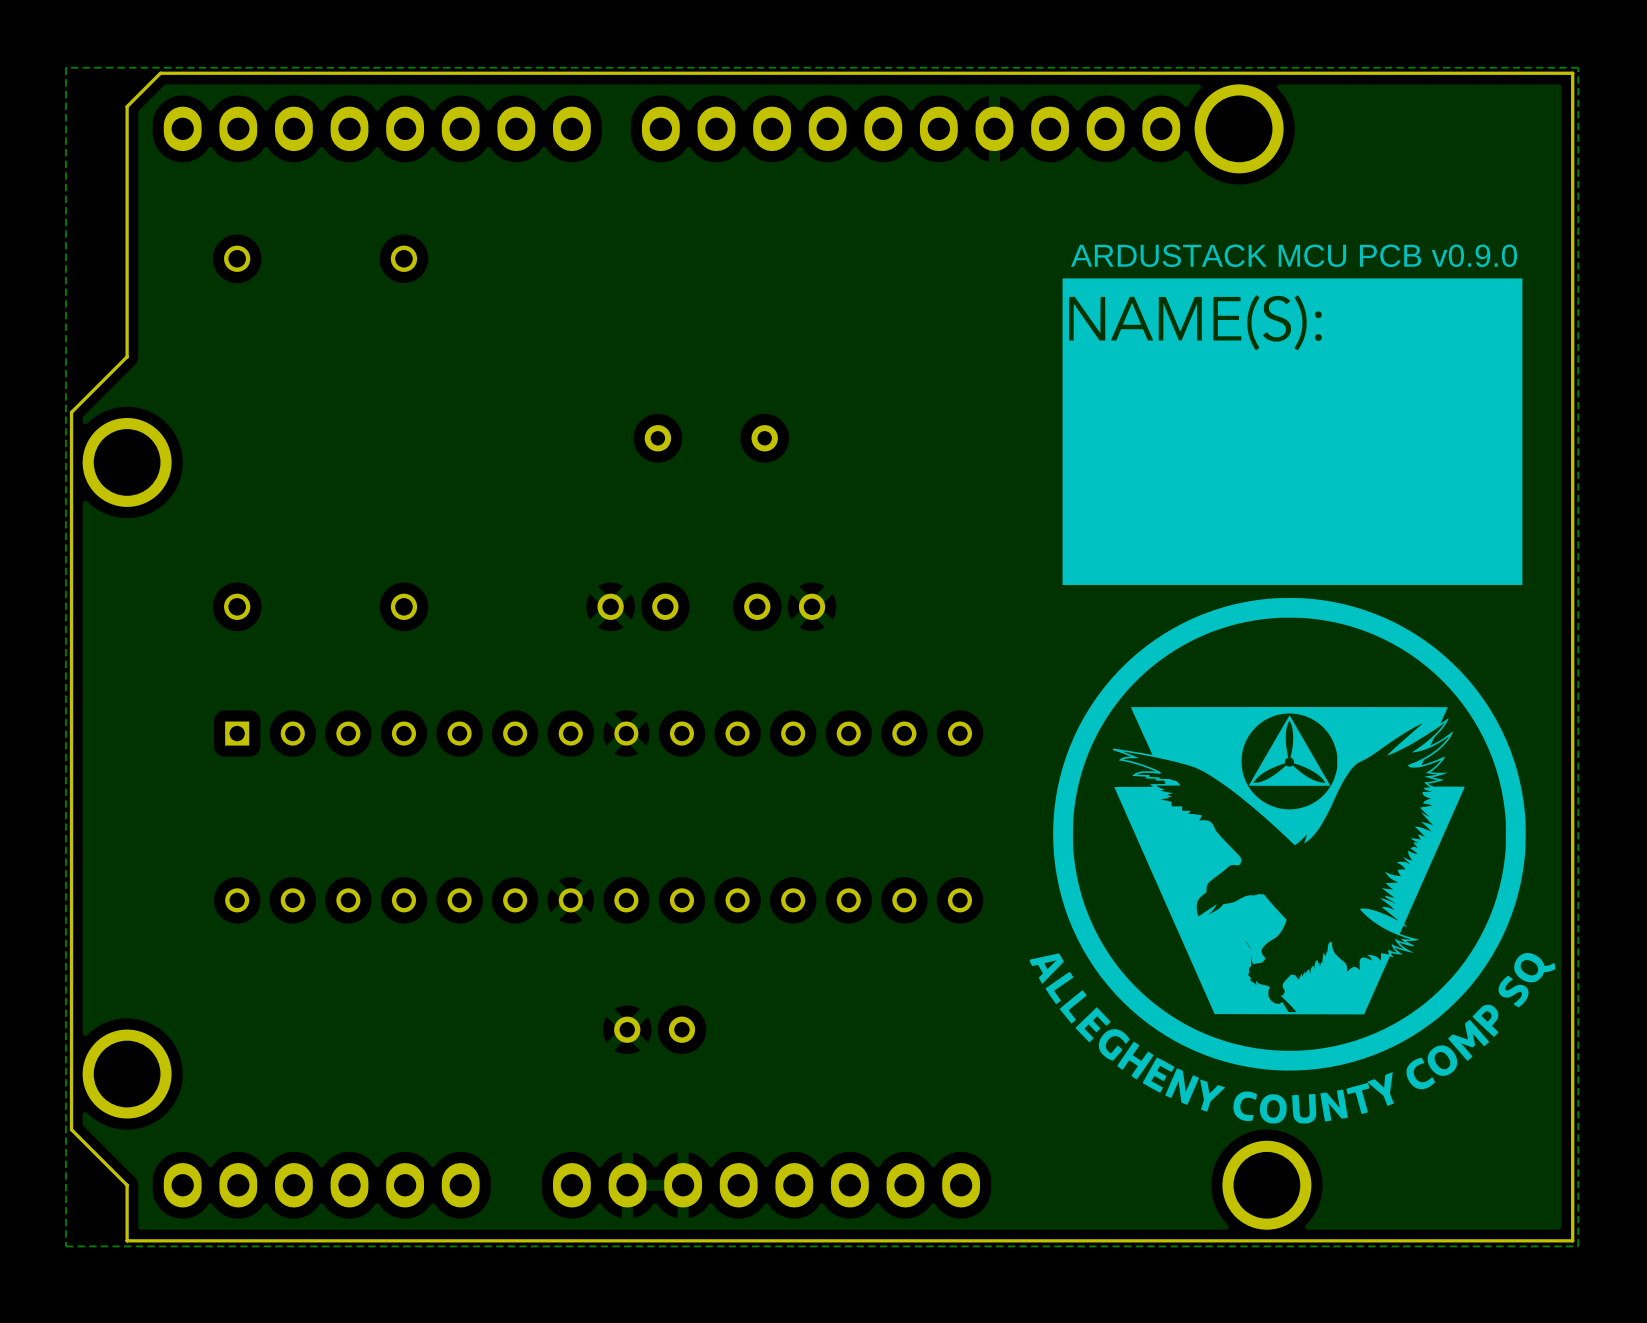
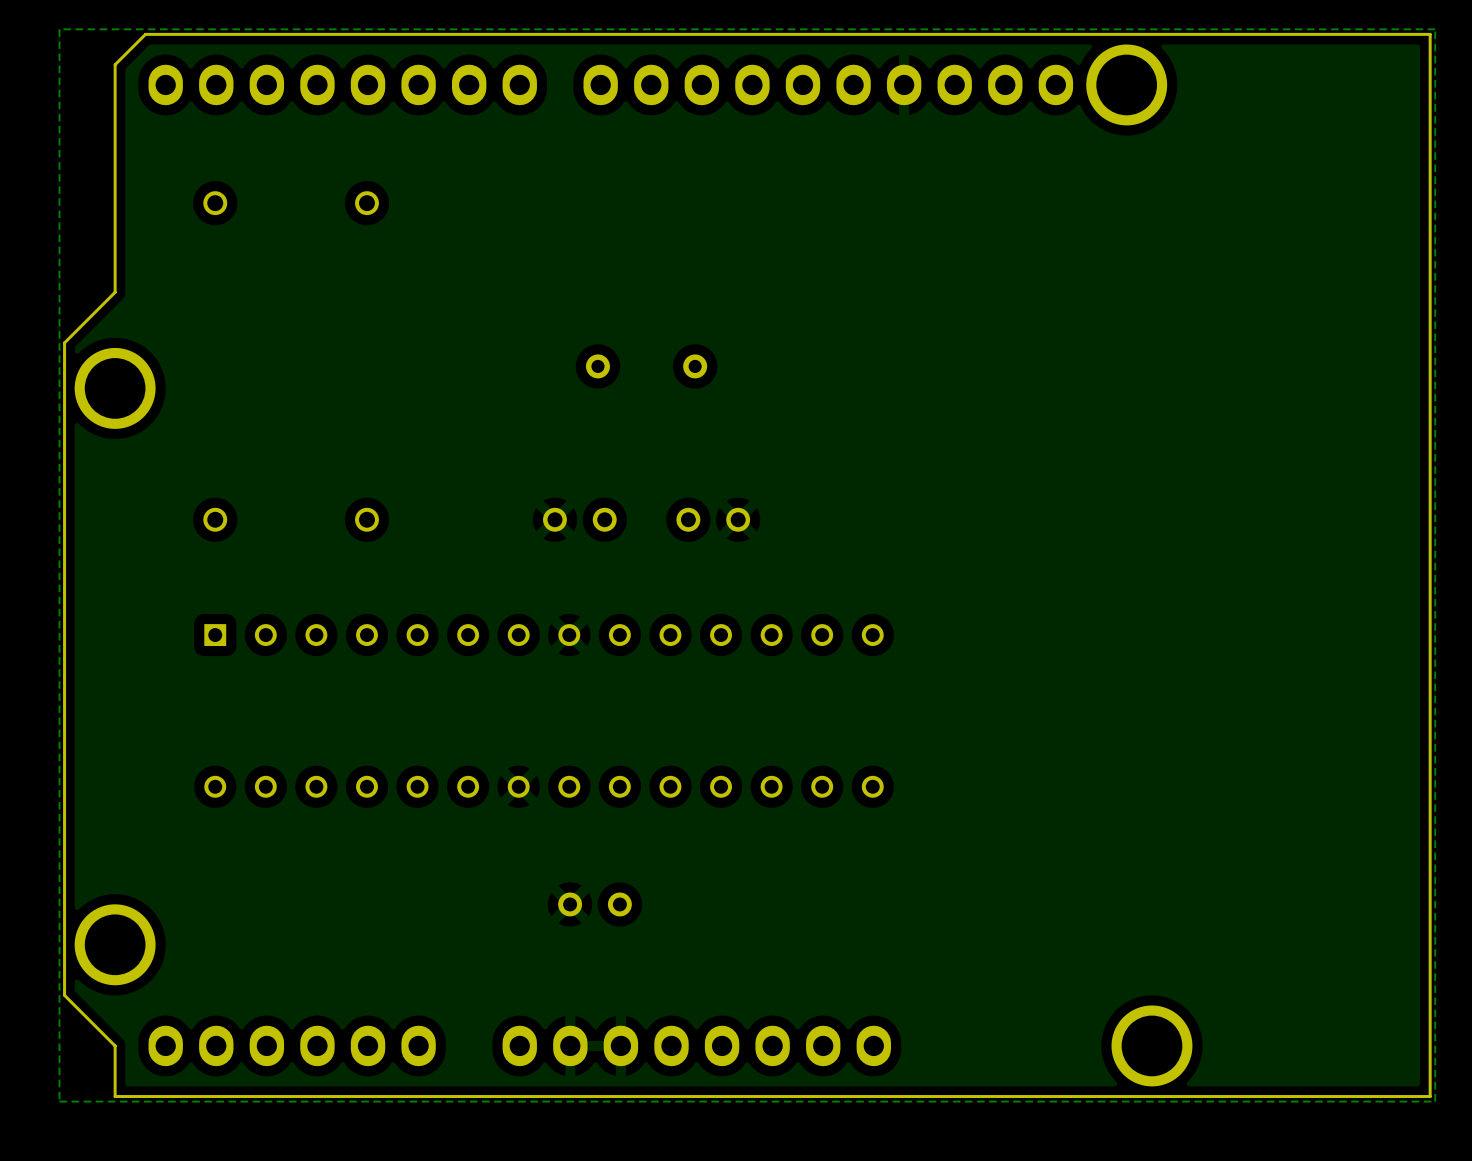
text: ARDUSTACK MCU PCB v0.9.0 (1294, 255) -> none
drawing: [1029, 278, 1556, 1124] -> none

